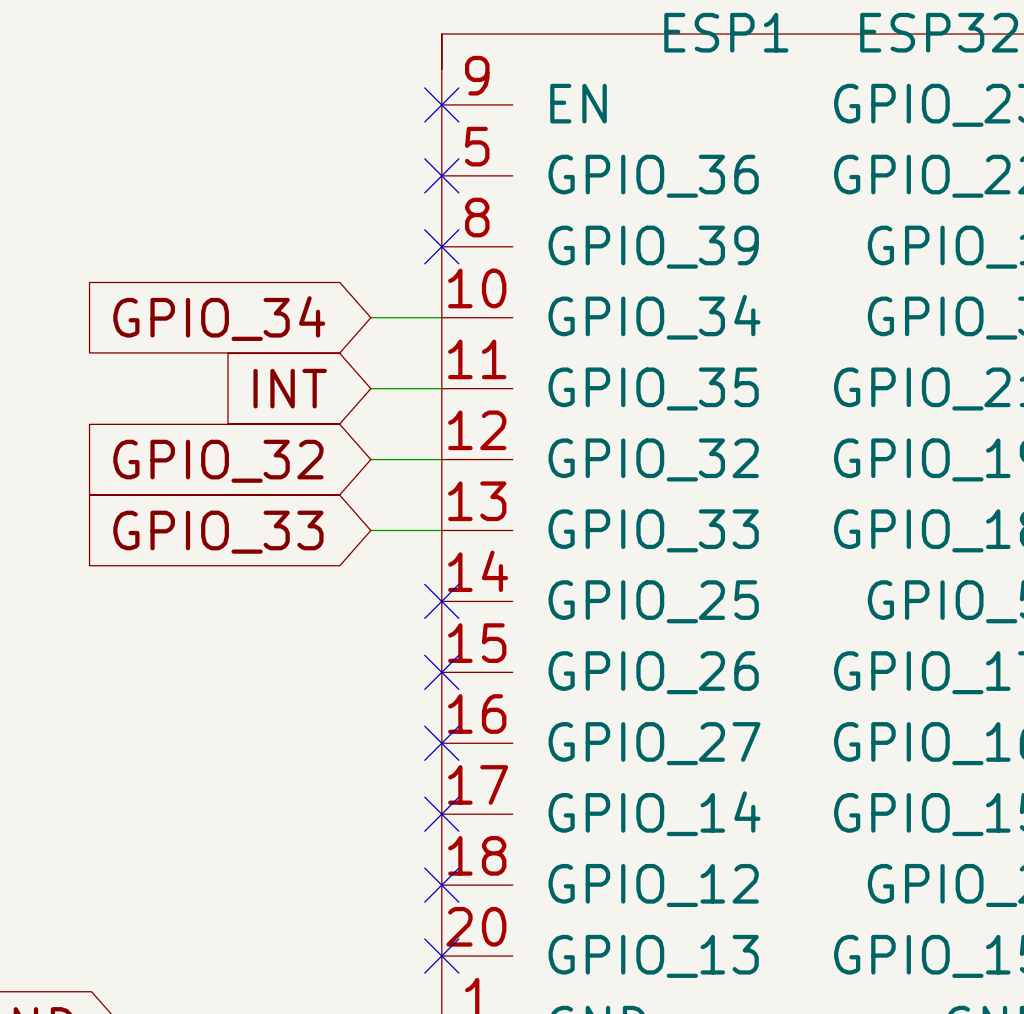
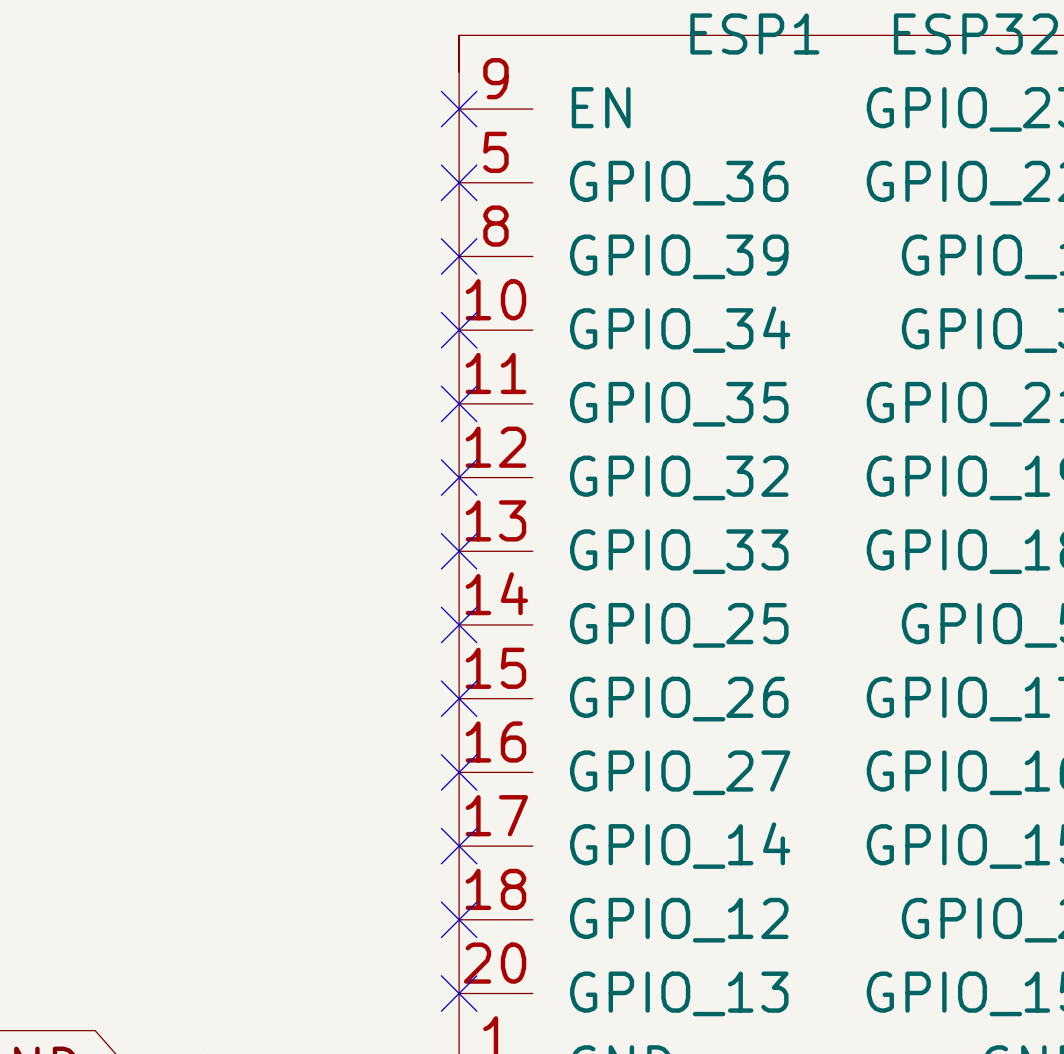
wire: (370, 317) (441, 317) -> none
no-connect mark: none -> (459, 330)
global label: GPIO_34 (219, 318) -> none
global label: INT (290, 388) -> none
wire: (370, 388) (441, 388) -> none
no-connect mark: none -> (459, 403)
wire: (370, 459) (441, 459) -> none
no-connect mark: none -> (459, 477)
global label: GPIO_32 (218, 461) -> none
wire: (370, 530) (441, 530) -> none
no-connect mark: none -> (459, 551)
global label: GPIO_33 (218, 532) -> none

